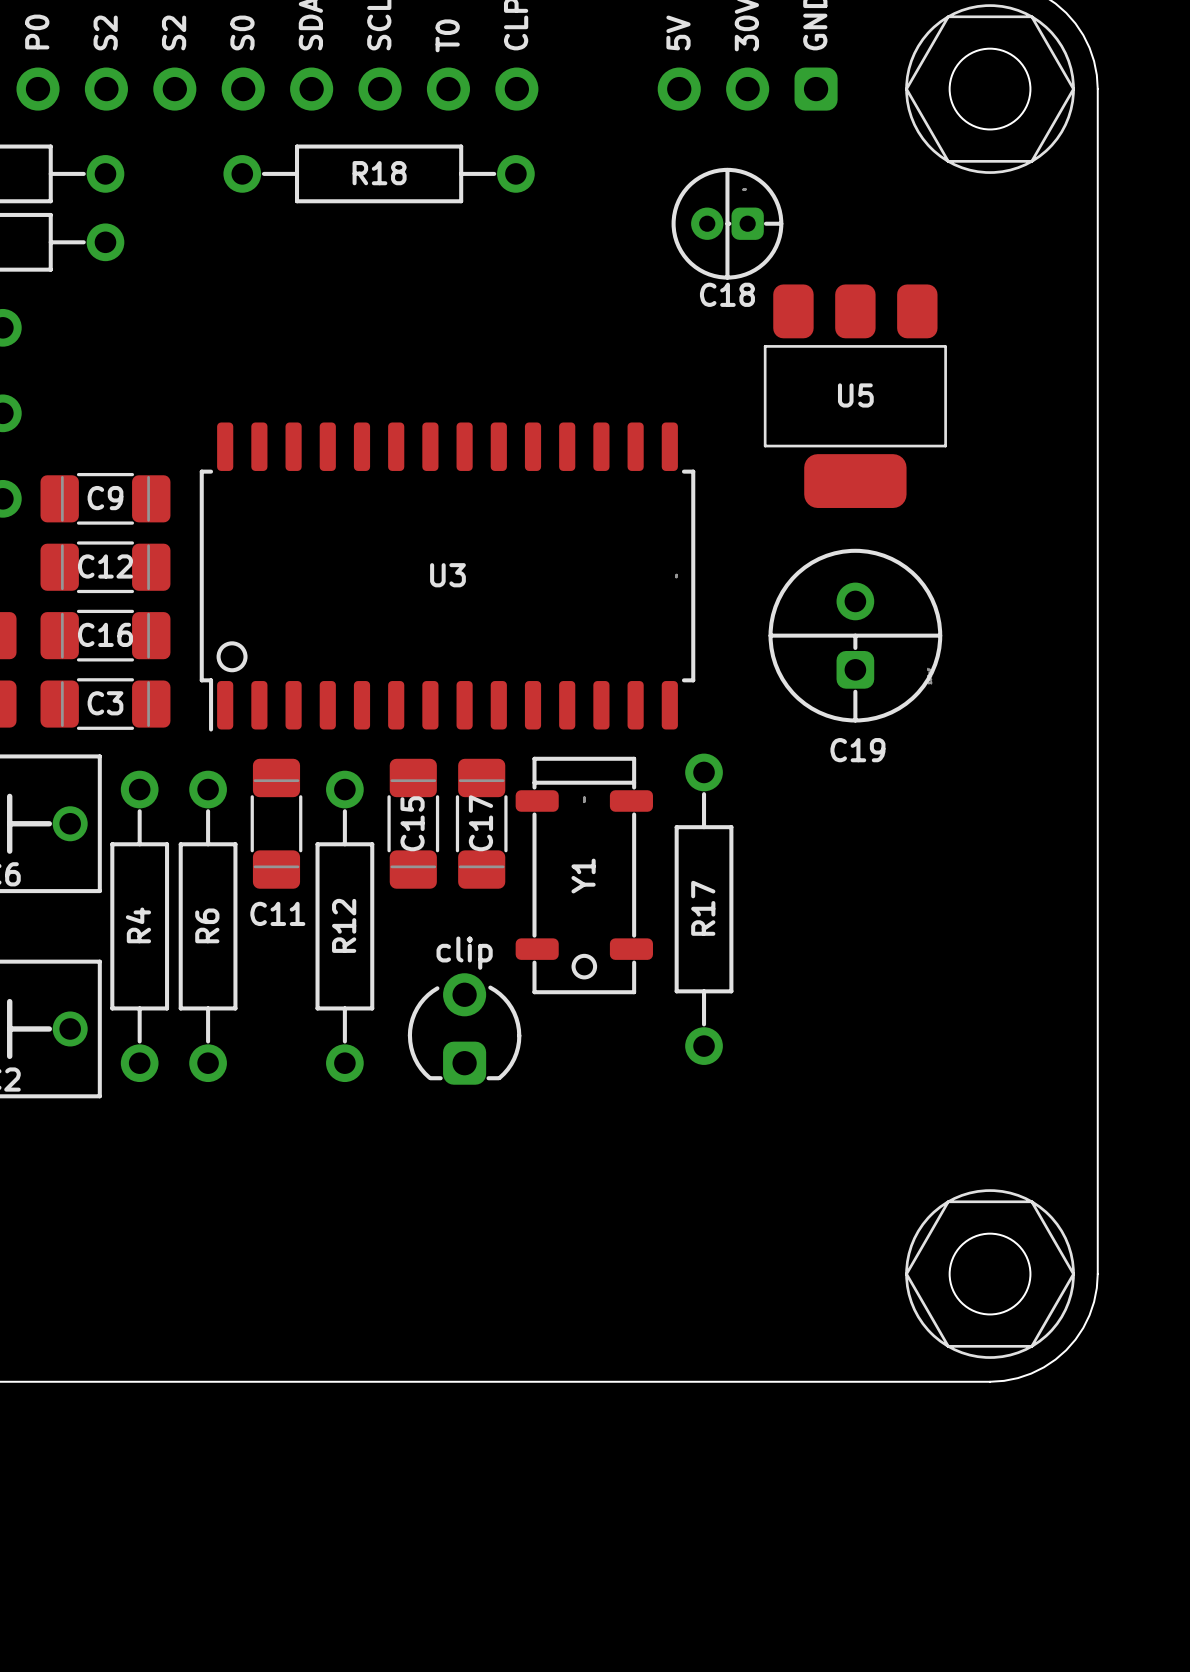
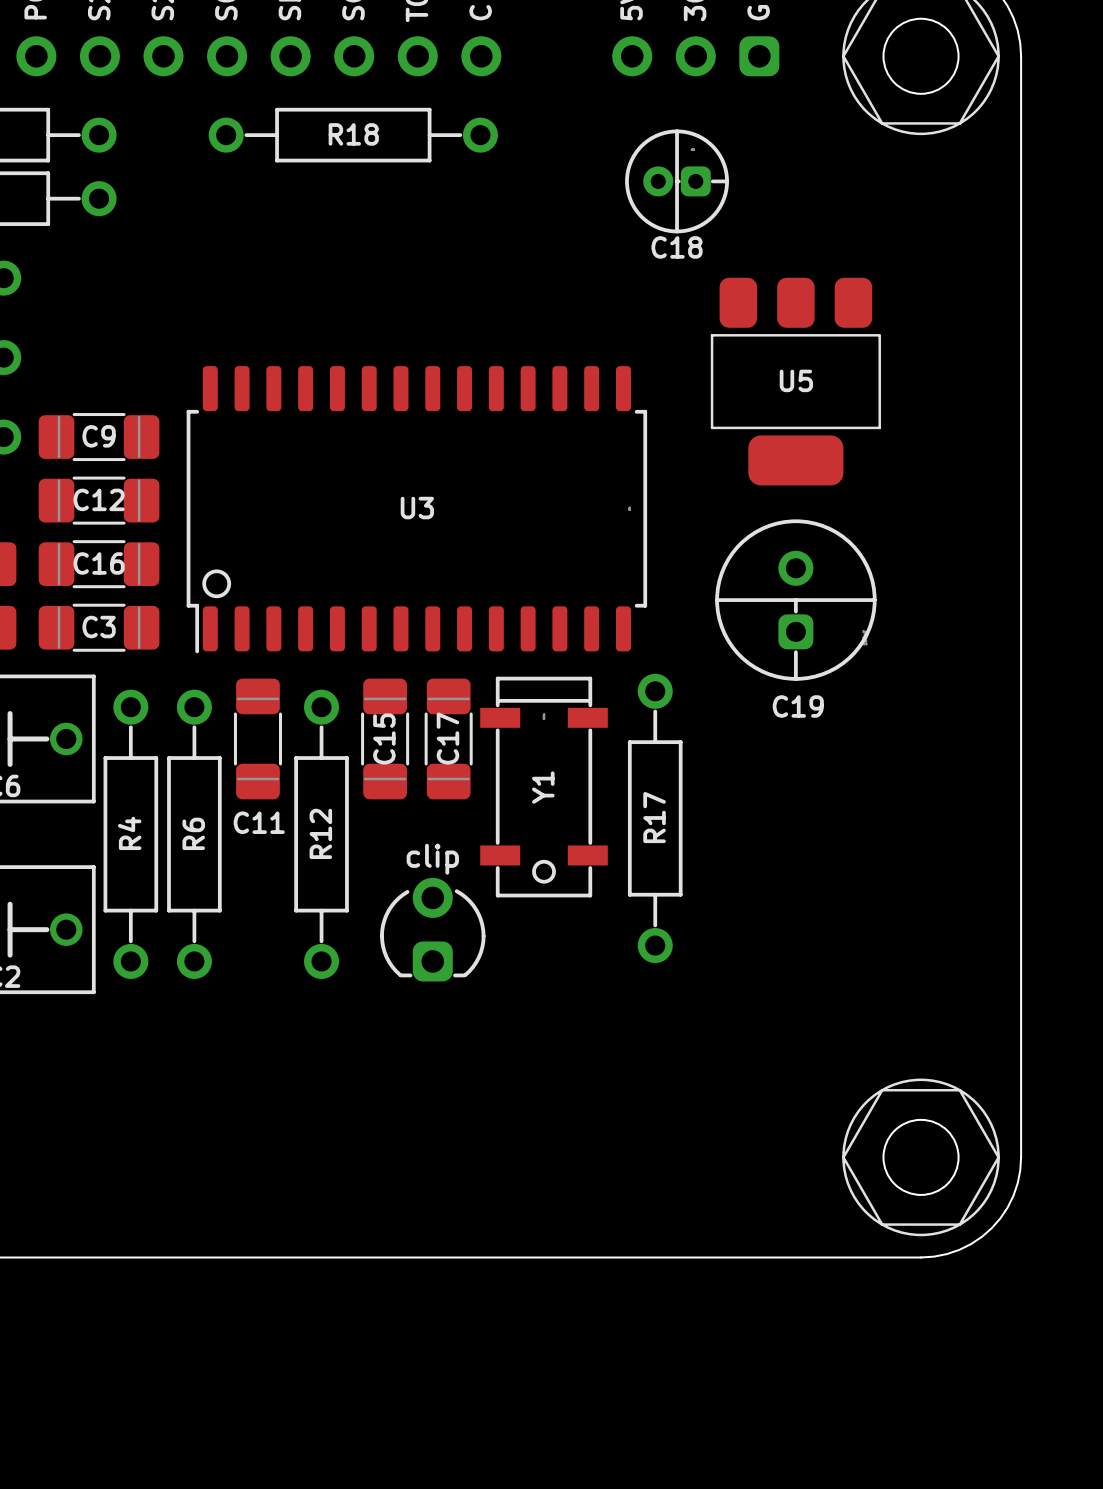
U5 position: (855, 396) -> (795, 381)
C19 position: (855, 635) -> (795, 600)
Y1 footprint: [515, 756, 653, 995] -> [480, 676, 608, 898]

